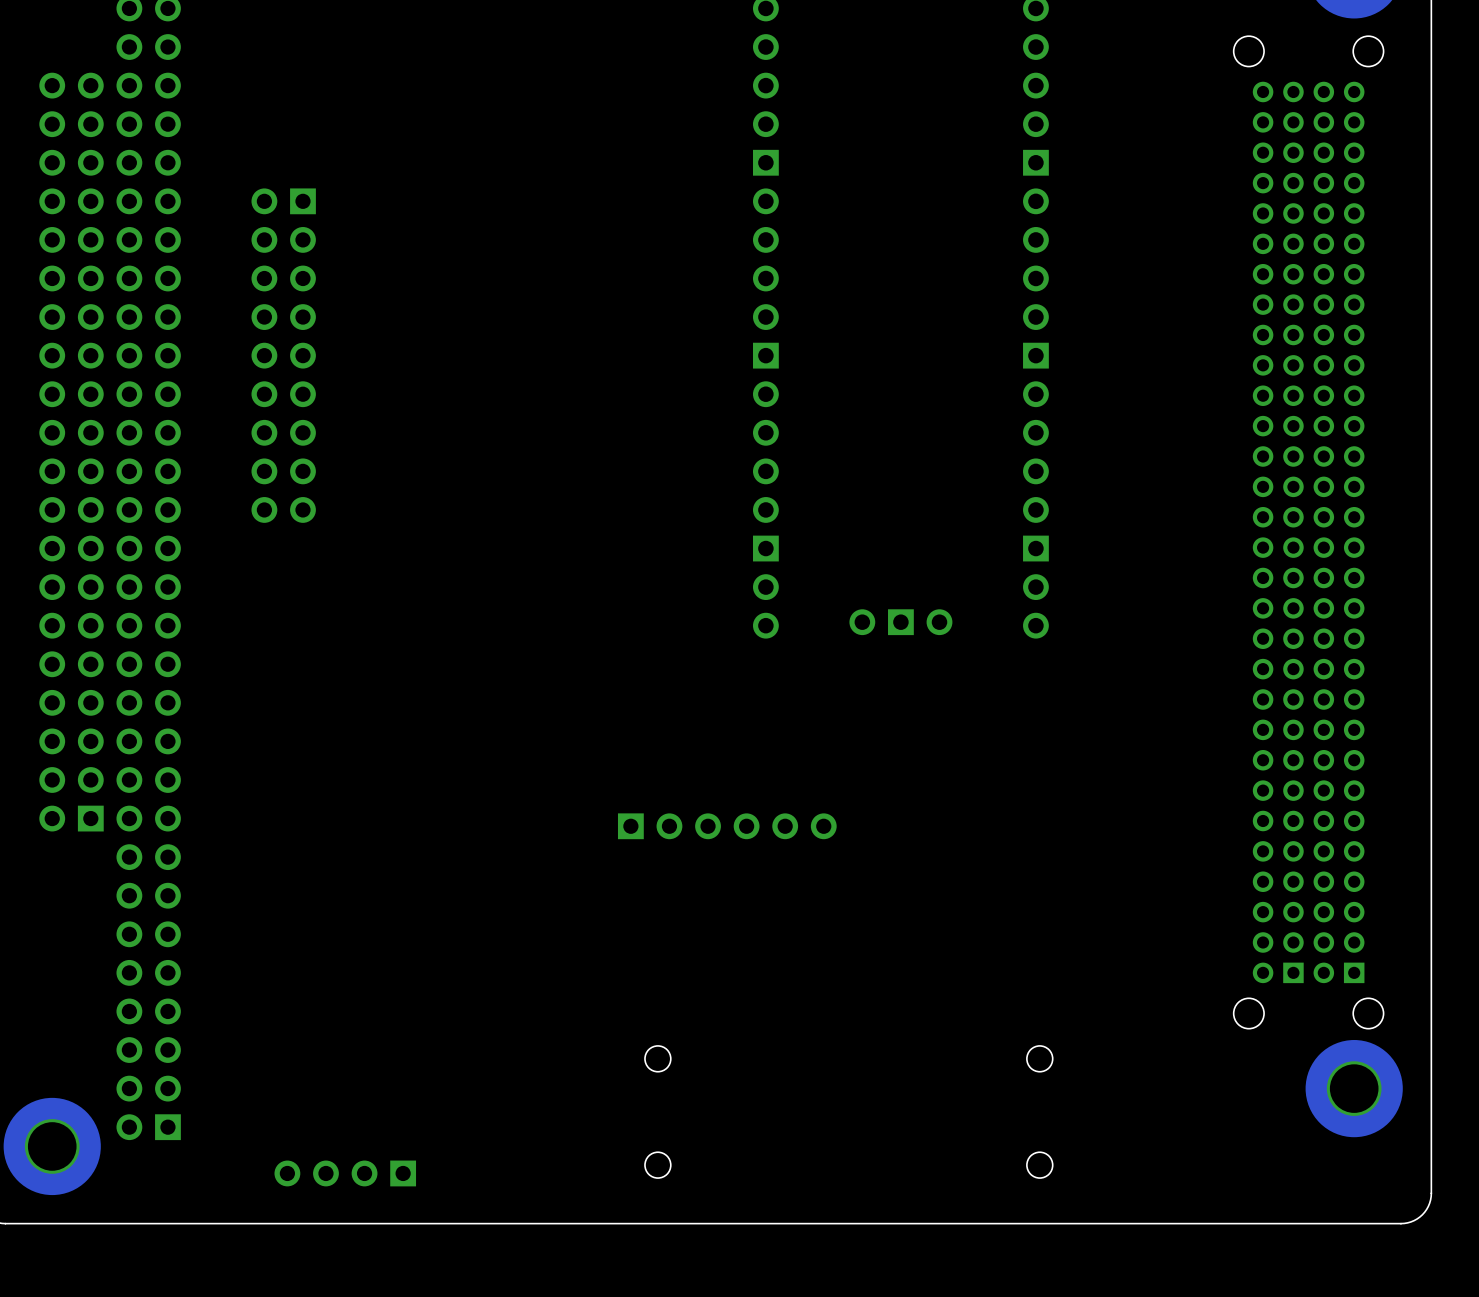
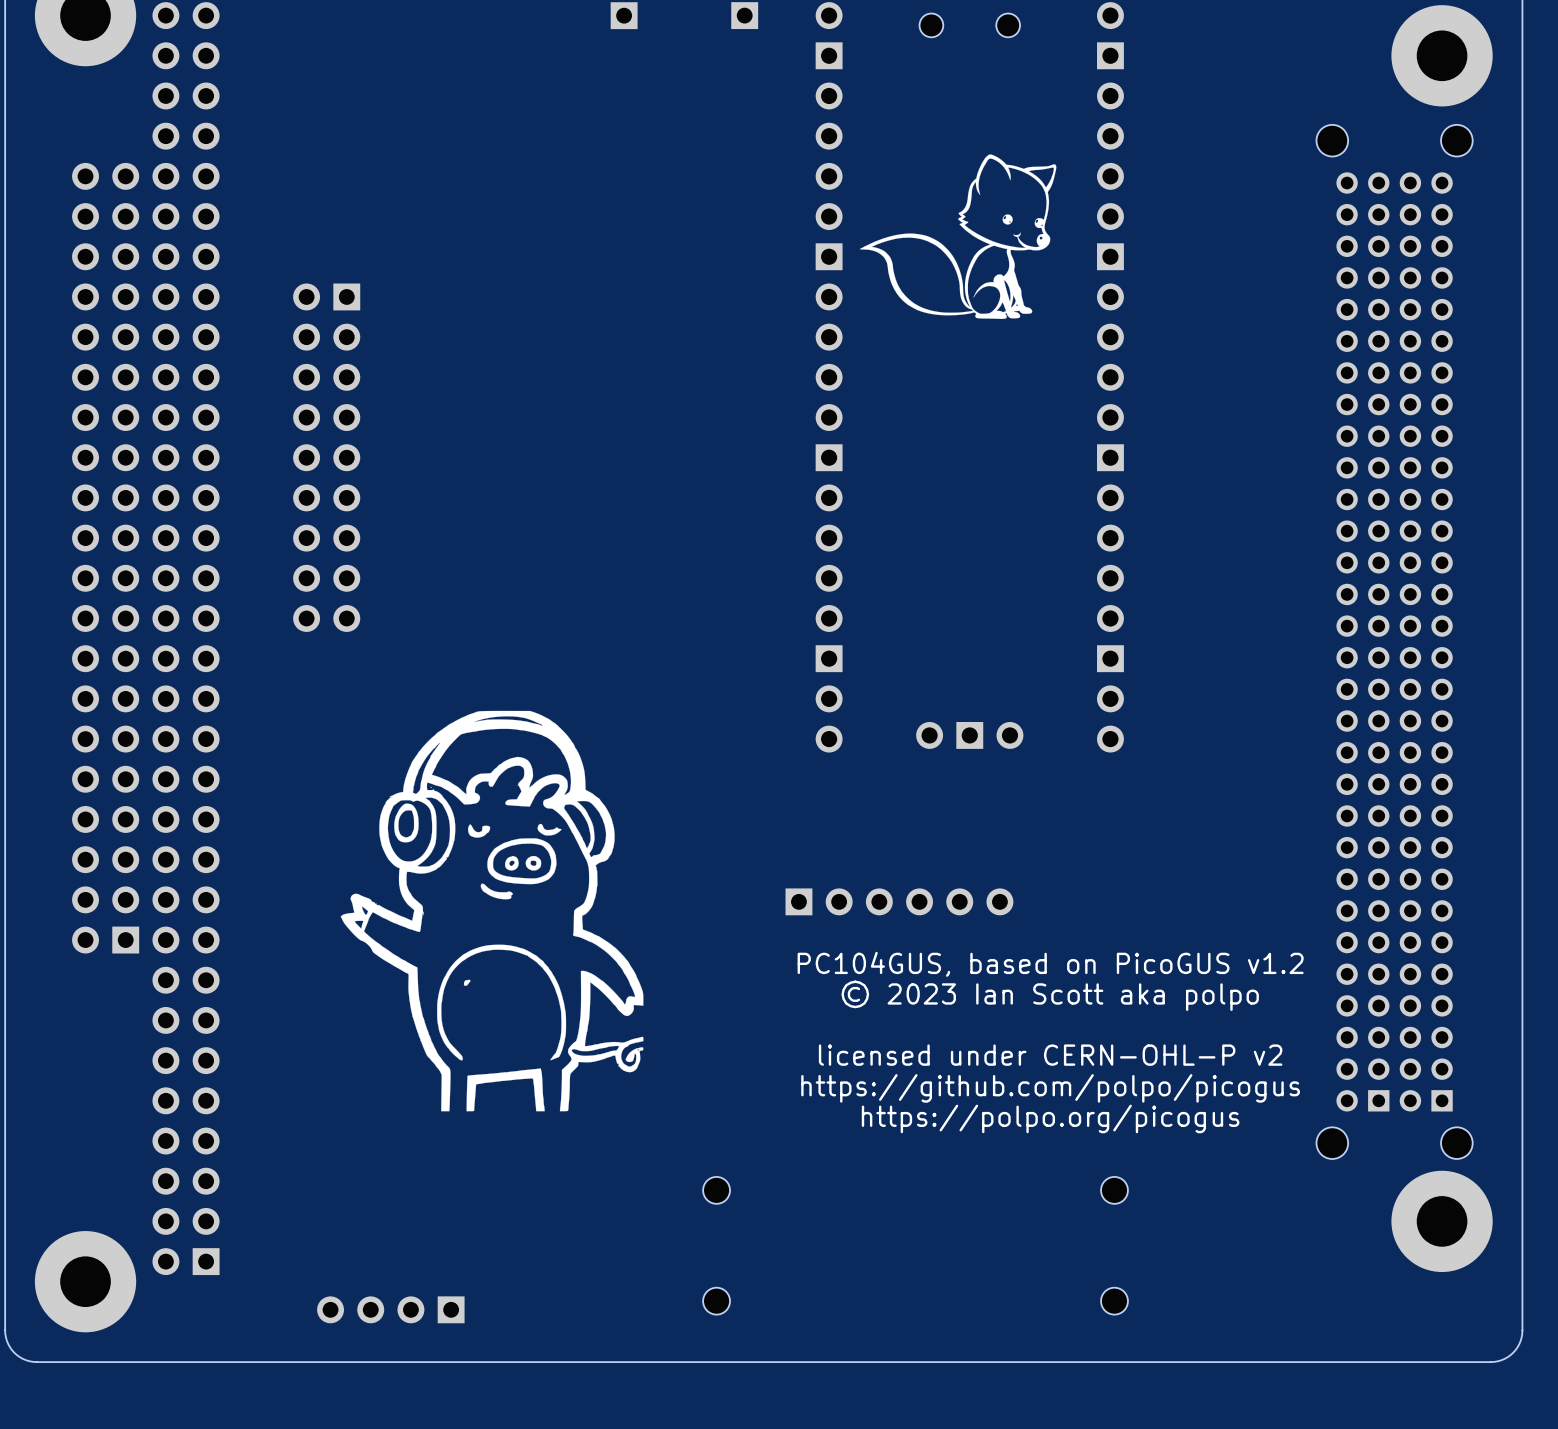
drawing: none -> [859, 154, 1057, 319]
drawing: none -> [340, 710, 644, 1112]
part position: (727, 826) -> (899, 901)
text: none -> PC104GUS, based on PicoGUS v1.2 (1050, 964)
text: none -> © 2023 Ian Scott aka polpo (1050, 995)
text: none -> licensed under CERN-OHL-P v2 (1050, 1055)
text: none -> https://github.com/polpo/picogus (1050, 1088)
text: none -> https://polpo.org/picogus (1050, 1118)

